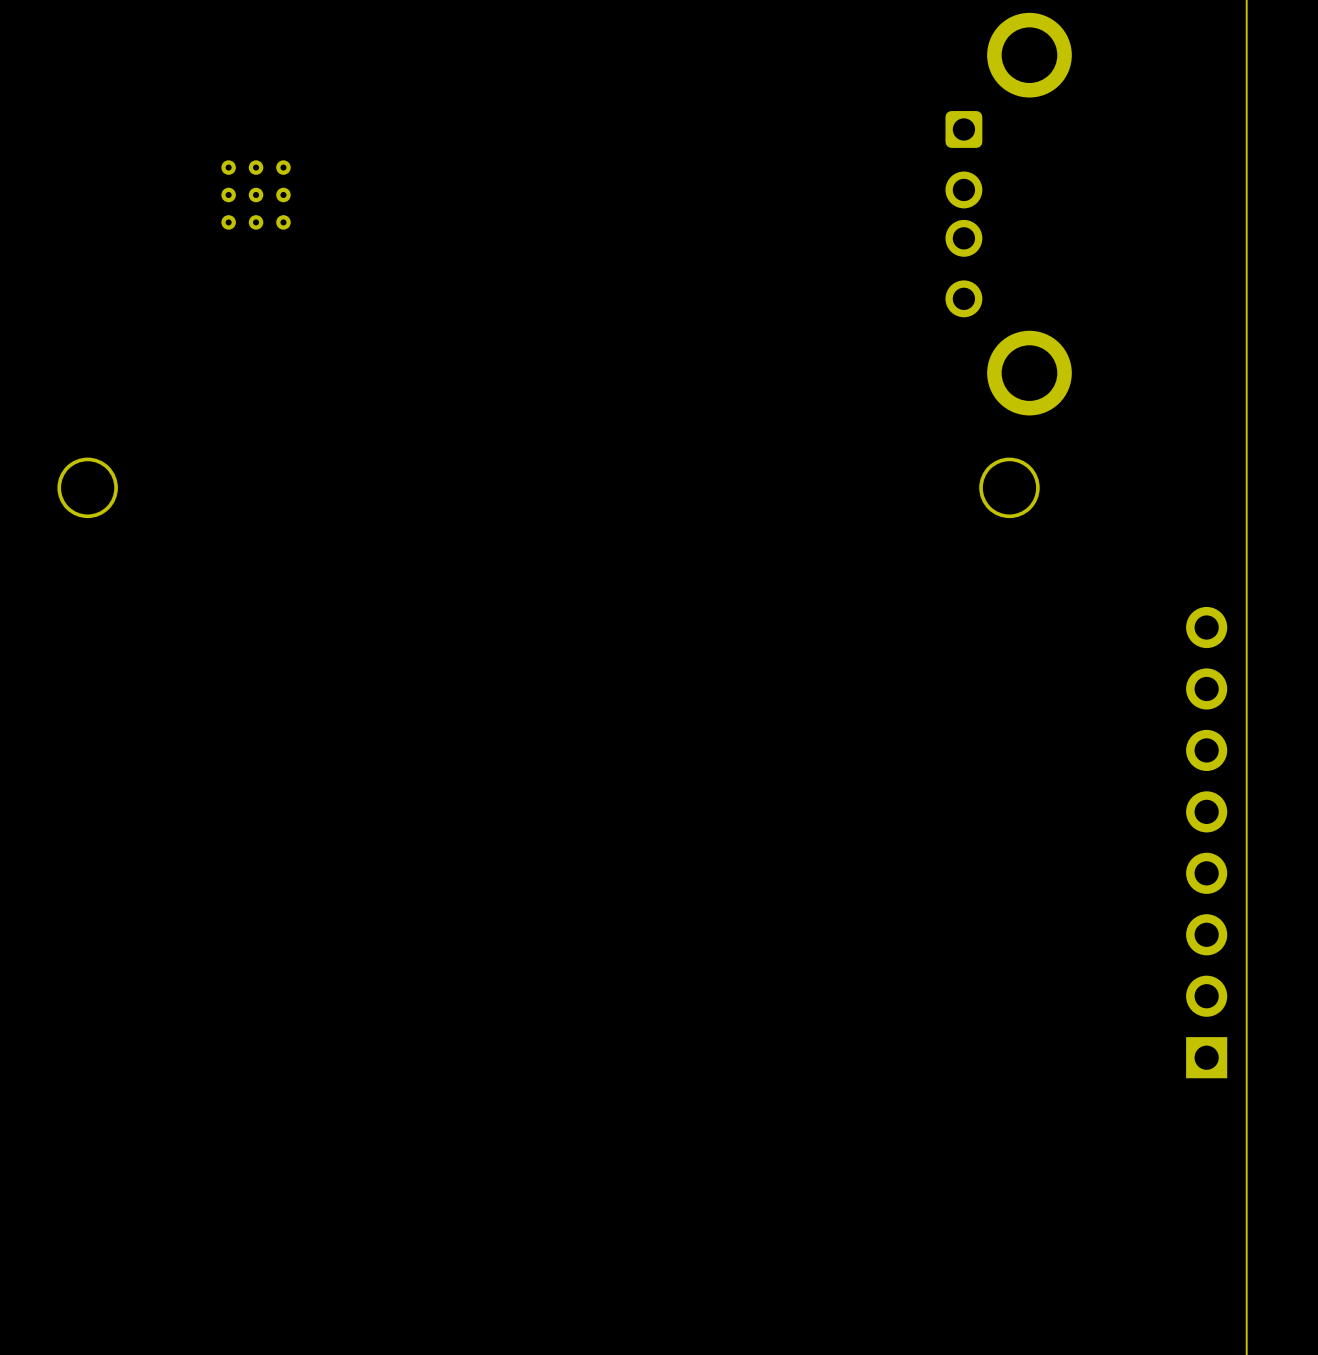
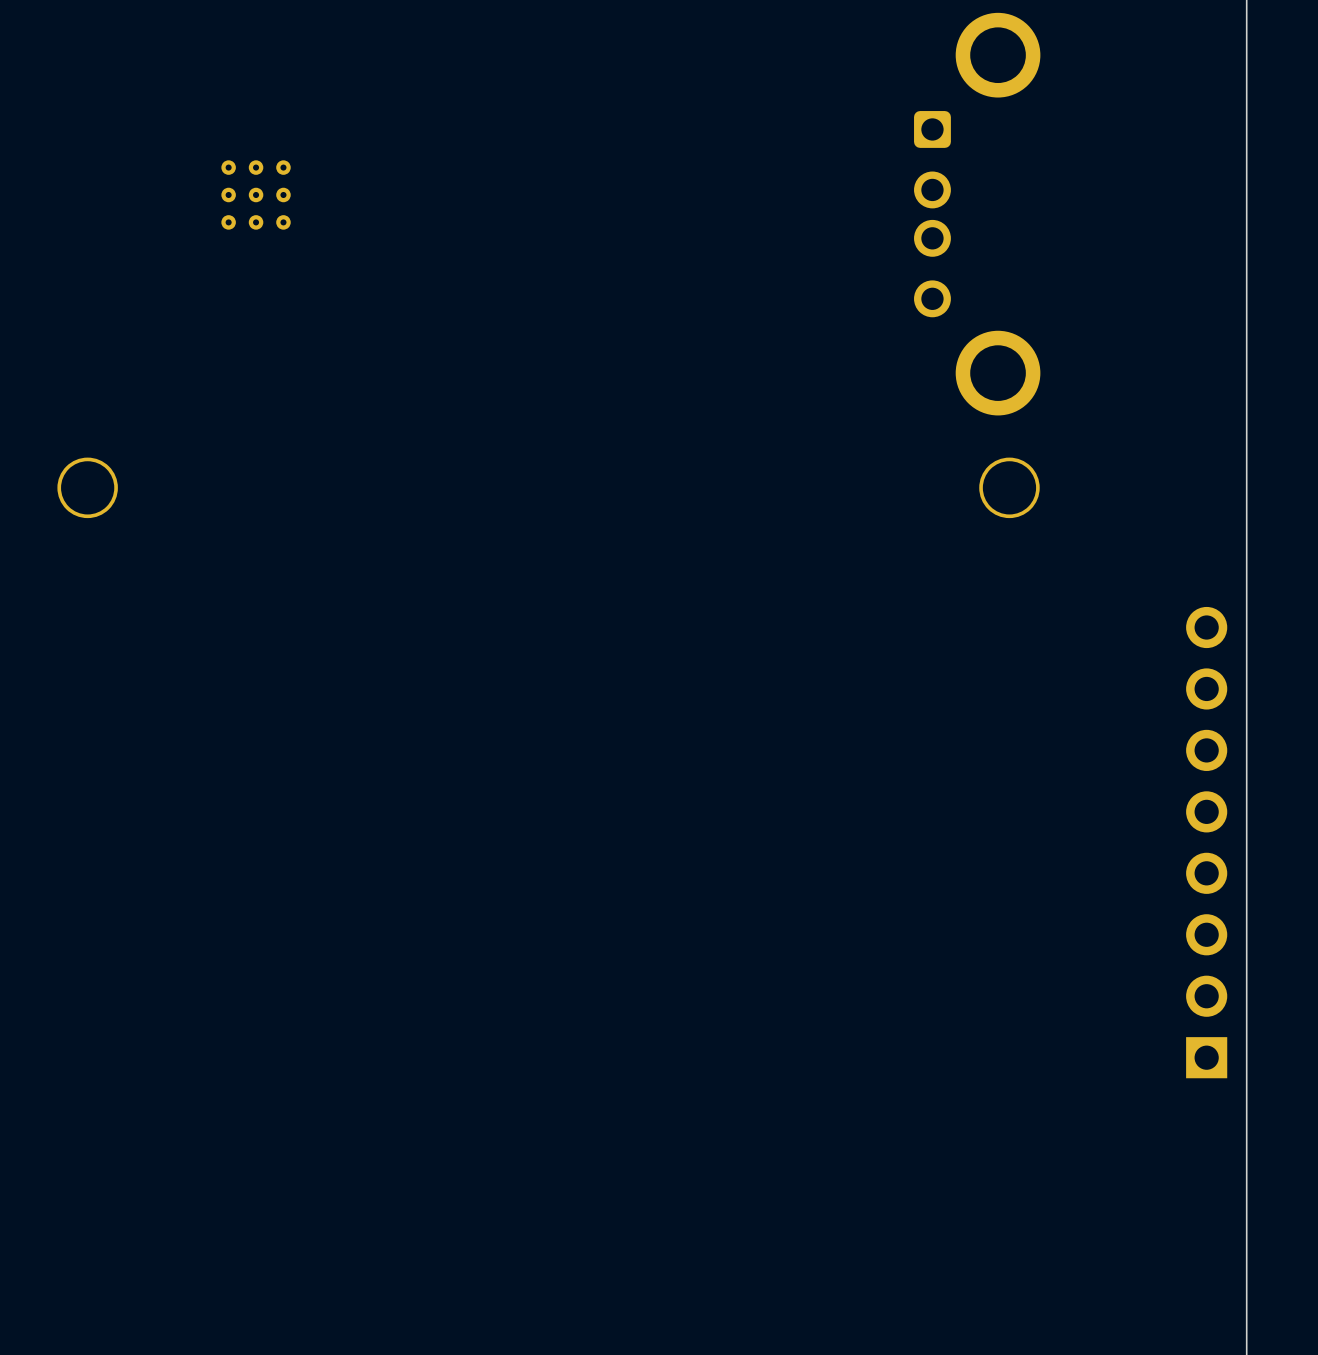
part position: (1008, 214) -> (977, 214)

